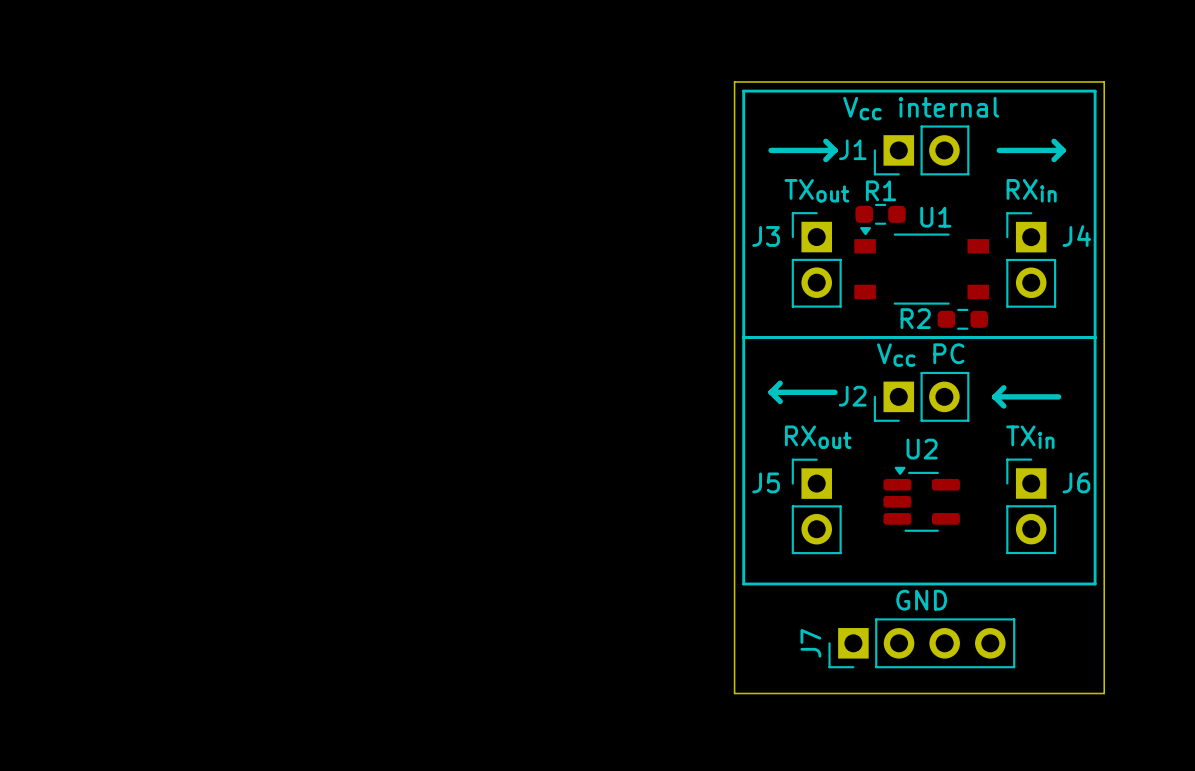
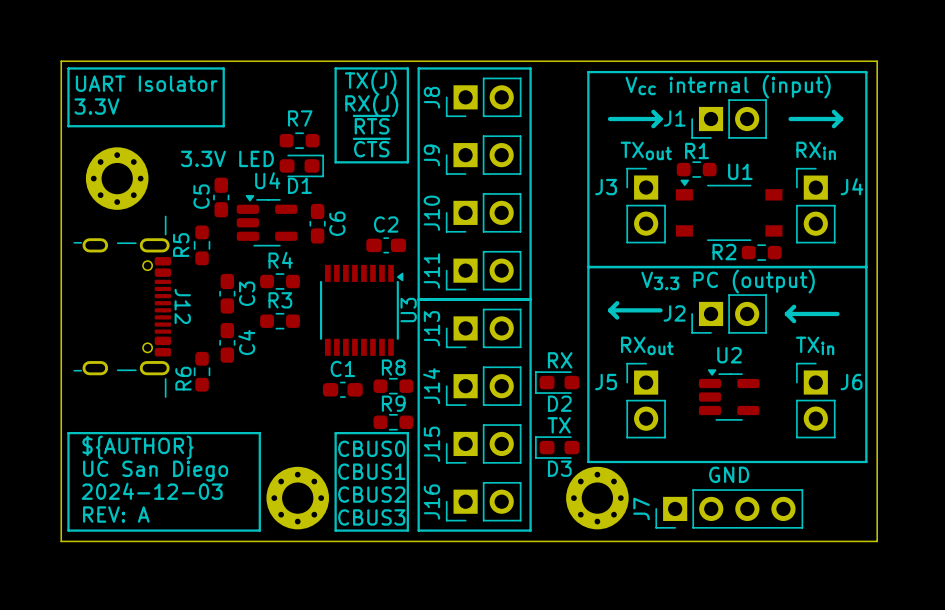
board edge: none -> (61, 61) (877, 61) (877, 541) (61, 541) (61, 61)
board edge: (734, 81) (1104, 81) (1104, 693) (734, 693) (734, 81) -> none
line: none -> (68, 68) (223, 68) (223, 126) (68, 126) (68, 68)
line: none -> (335, 68) (407, 68) (407, 162) (335, 162) (335, 68)
line: none -> (418, 68) (530, 68) (530, 530) (418, 530) (418, 68)
text: none -> TX(J) (370, 82)
text: none -> UART Isolator (146, 83)
text: Vcc internal (921, 108) -> Vcc internal (input) (728, 86)
J8: none -> (483, 97)
text: none -> RX(J) (371, 105)
text: none -> 3.3V (96, 106)
text: none -> ~{RTS} (371, 124)
R7: none -> (299, 140)
text: none -> ~{CTS} (371, 147)
J9: none -> (483, 155)
text: none -> 3.3V LED (227, 158)
D1: none -> (301, 165)
part: none -> (117, 178)
C5: none -> (221, 197)
J10: none -> (483, 212)
U4: none -> (267, 220)
C6: none -> (317, 223)
R5: none -> (202, 245)
C2: none -> (386, 245)
J11: none -> (483, 270)
R4: none -> (280, 281)
text: Vcc PC (920, 355) -> V3.3 PC (output) (728, 281)
C3: none -> (227, 293)
line: none -> (418, 299) (530, 299)
J12: none -> (122, 306)
U3: none -> (361, 310)
R3: none -> (280, 321)
J13: none -> (483, 328)
C4: none -> (227, 342)
text: none -> RX (560, 360)
R6: none -> (202, 371)
D2: none -> (557, 382)
R8: none -> (393, 386)
J14: none -> (483, 386)
C1: none -> (342, 389)
R9: none -> (393, 422)
text: none -> TX (559, 425)
line: none -> (68, 433) (68, 530) (259, 530) (259, 433) (68, 433)
line: none -> (335, 433) (335, 530) (407, 530) (407, 433) (335, 433)
J15: none -> (483, 443)
text: none -> ${AUTHOR} (137, 447)
D3: none -> (557, 447)
text: none -> CBUS0 (371, 448)
text: none -> UC San Diego (155, 471)
text: none -> CBUS1 (371, 471)
text: none -> 2024-12-03 (152, 491)
text: none -> CBUS2 (371, 494)
part: none -> (297, 498)
part: none -> (597, 498)
J16: none -> (483, 501)
text: none -> REV: A (116, 514)
text: none -> CBUS3 (371, 517)

